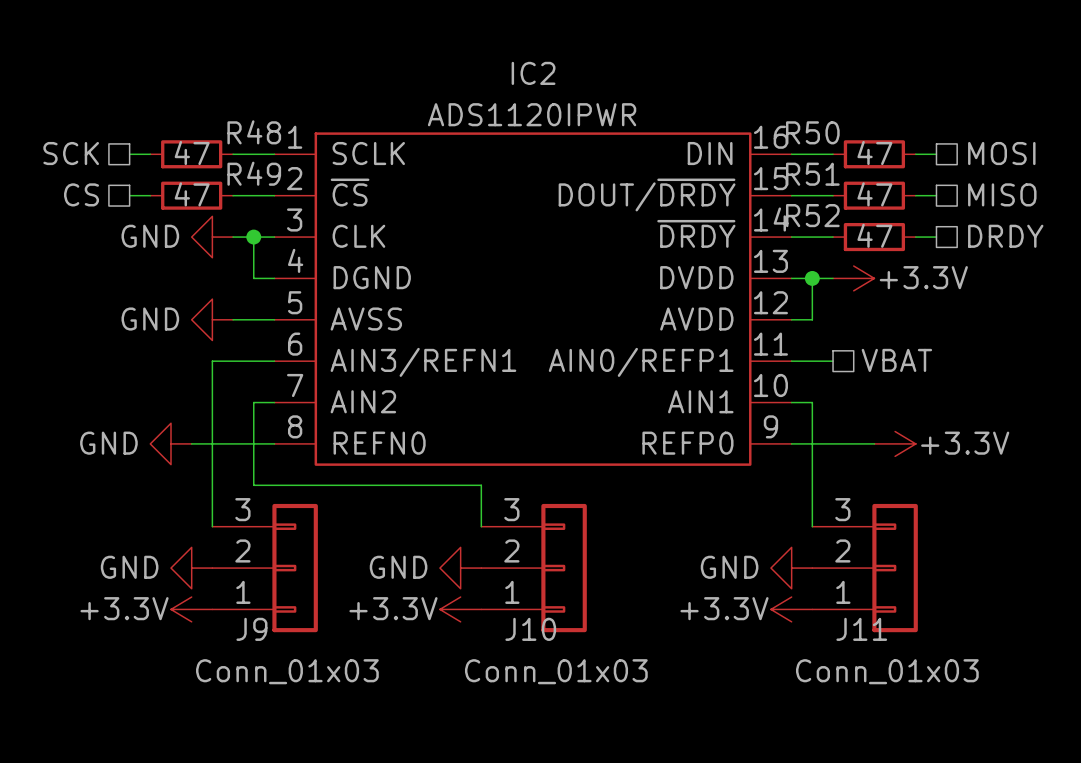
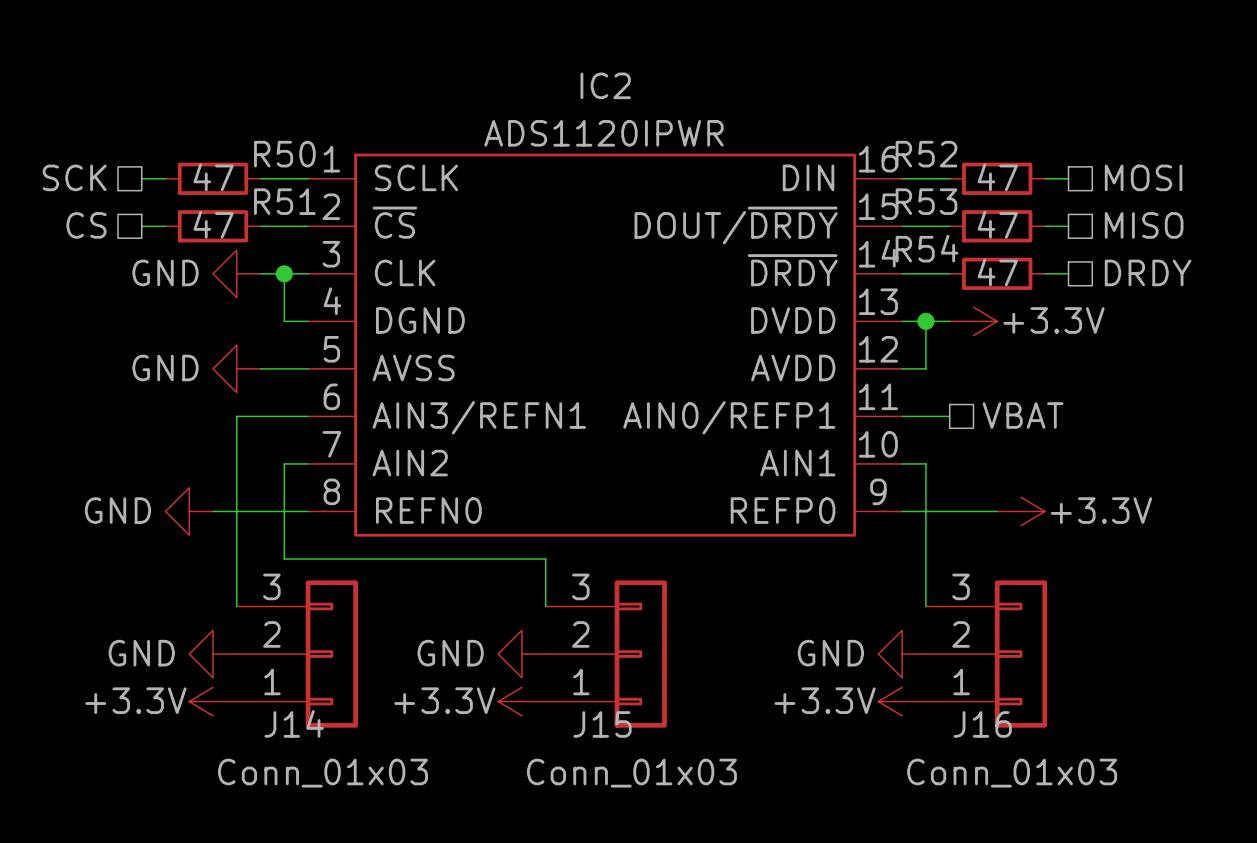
R48 name: R48 (254, 132) -> R50 (284, 154)
R50 name: R50 (812, 132) -> R52 (926, 154)
R49 name: R49 (254, 173) -> R51 (284, 201)
R51 name: R51 (812, 174) -> R53 (926, 201)
R52 name: R52 (812, 215) -> R54 (927, 248)
J9 name: J9 (251, 629) -> J14 (294, 723)
J10 name: J10 (530, 629) -> J15 (602, 724)
J11 name: J11 (861, 629) -> J16 (982, 724)

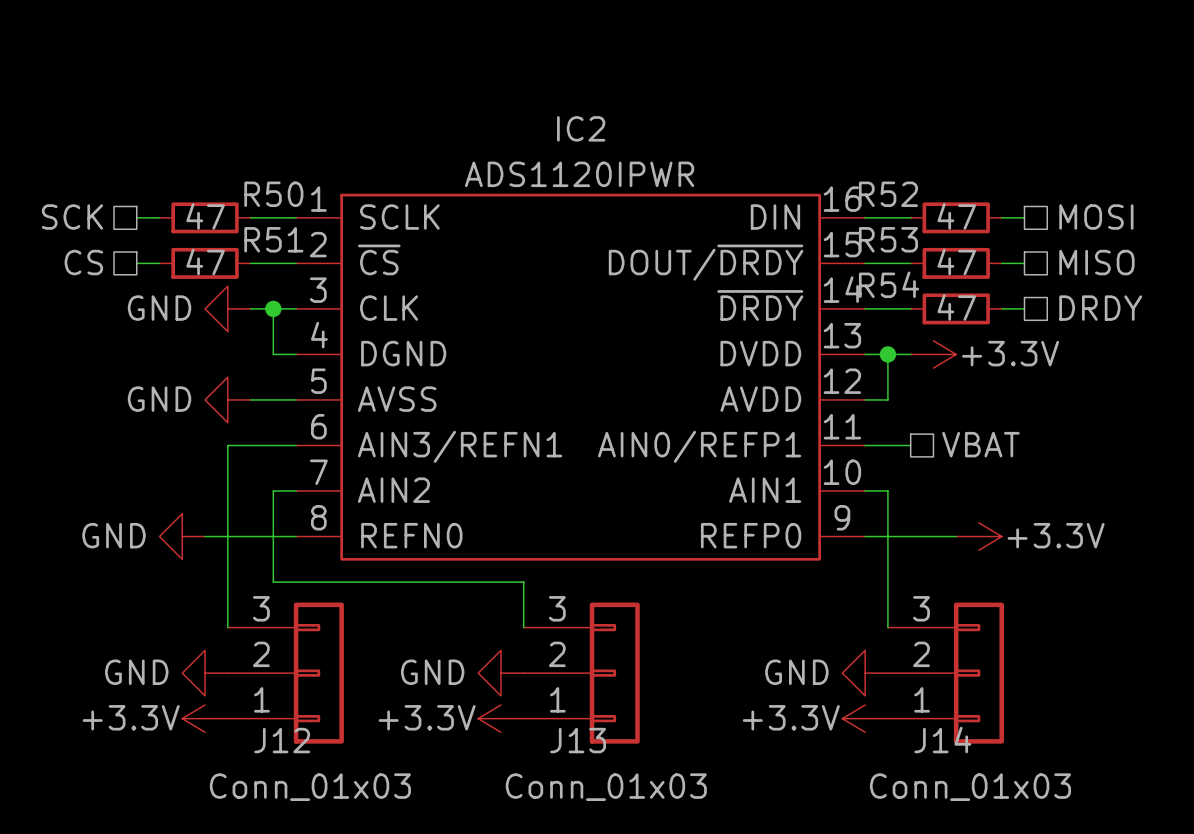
J14 name: J14 (294, 723) -> J12 (282, 740)
J15 name: J15 (602, 724) -> J13 (578, 740)
J16 name: J16 (982, 724) -> J14 (942, 740)

